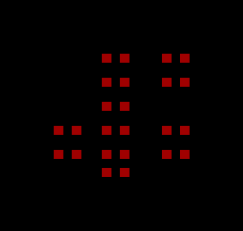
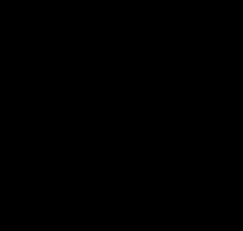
part: (115, 58) -> none
part: (175, 58) -> none
part: (115, 82) -> none
part: (175, 82) -> none
part: (115, 106) -> none
part: (67, 130) -> none
part: (115, 130) -> none
part: (175, 130) -> none
part: (67, 154) -> none
part: (115, 154) -> none
part: (175, 154) -> none
part: (115, 172) -> none

